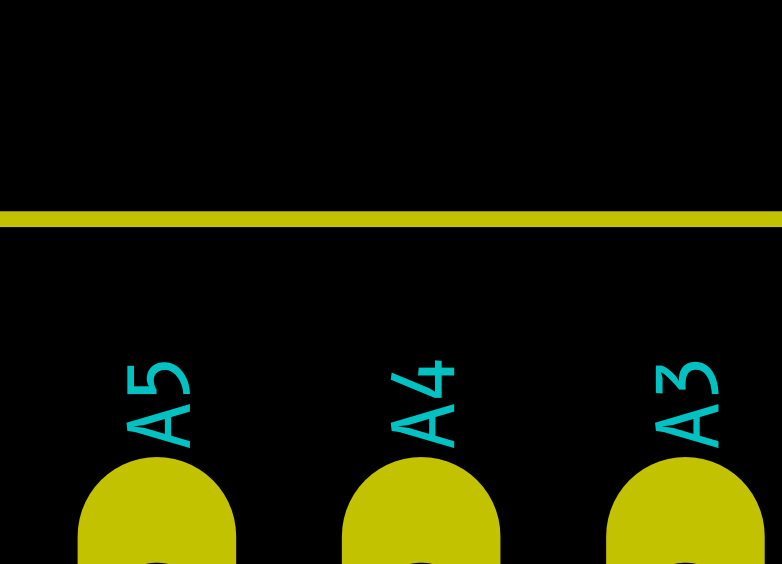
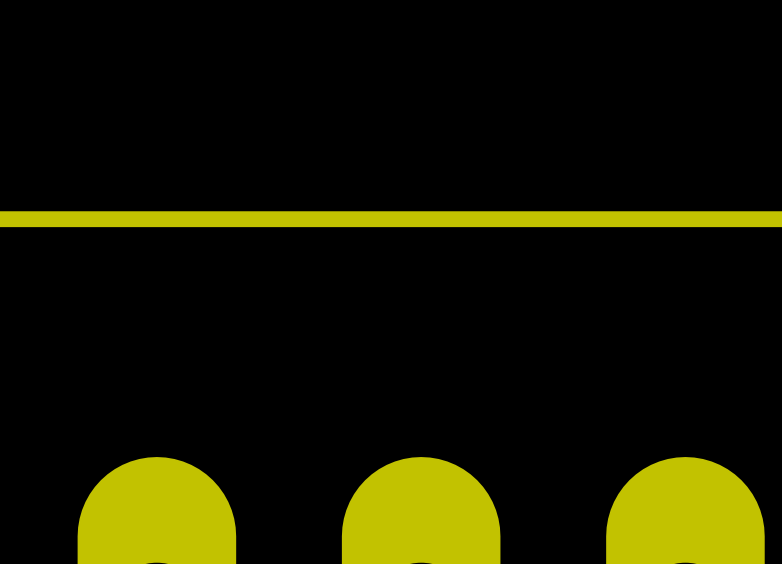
text: A4 (422, 404) -> none
text: A3 (686, 404) -> none
text: A5 (158, 405) -> none

